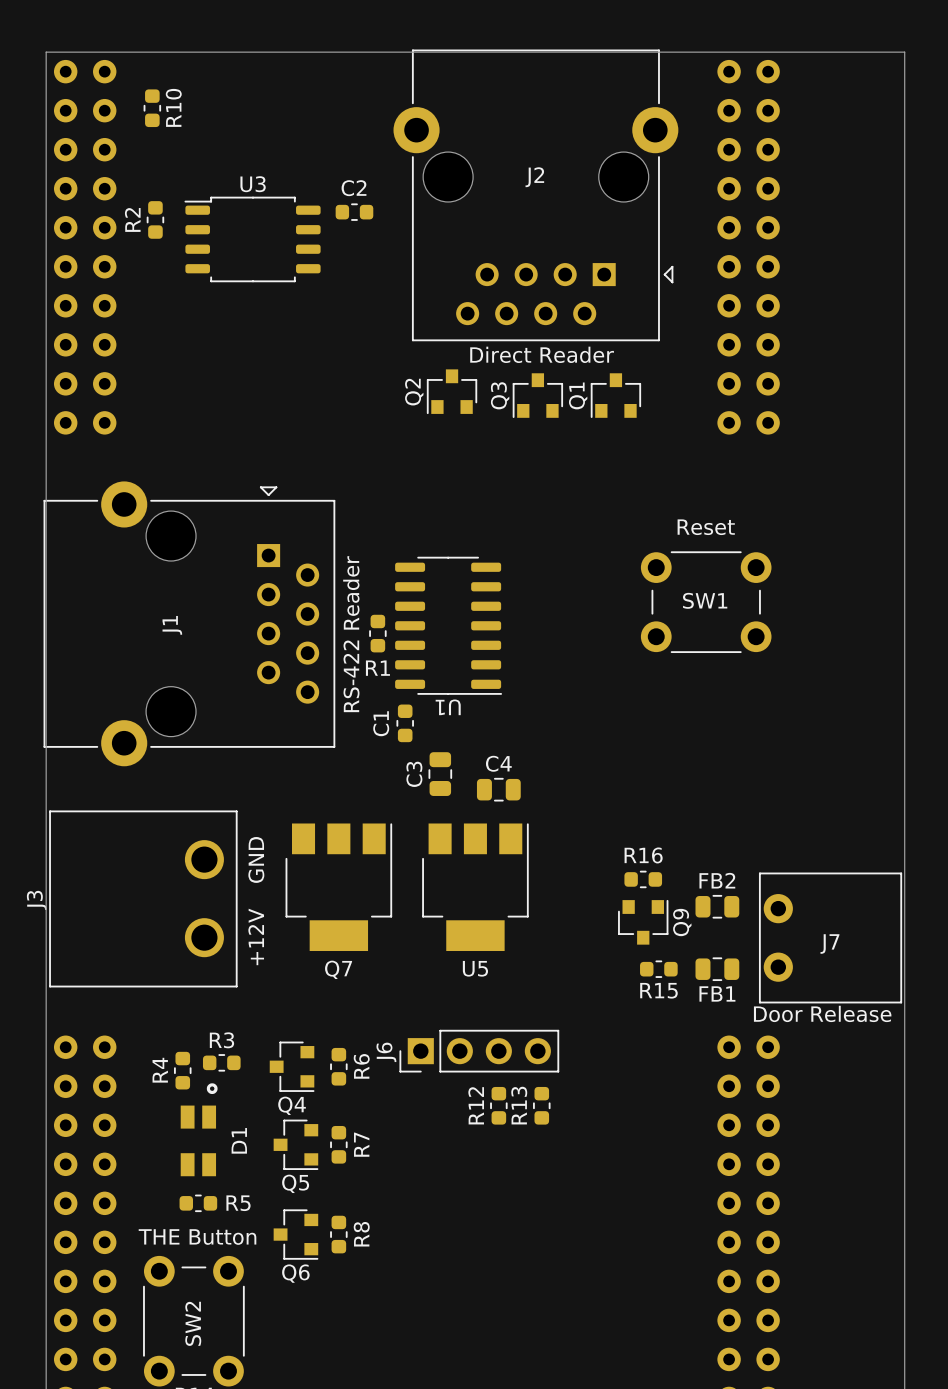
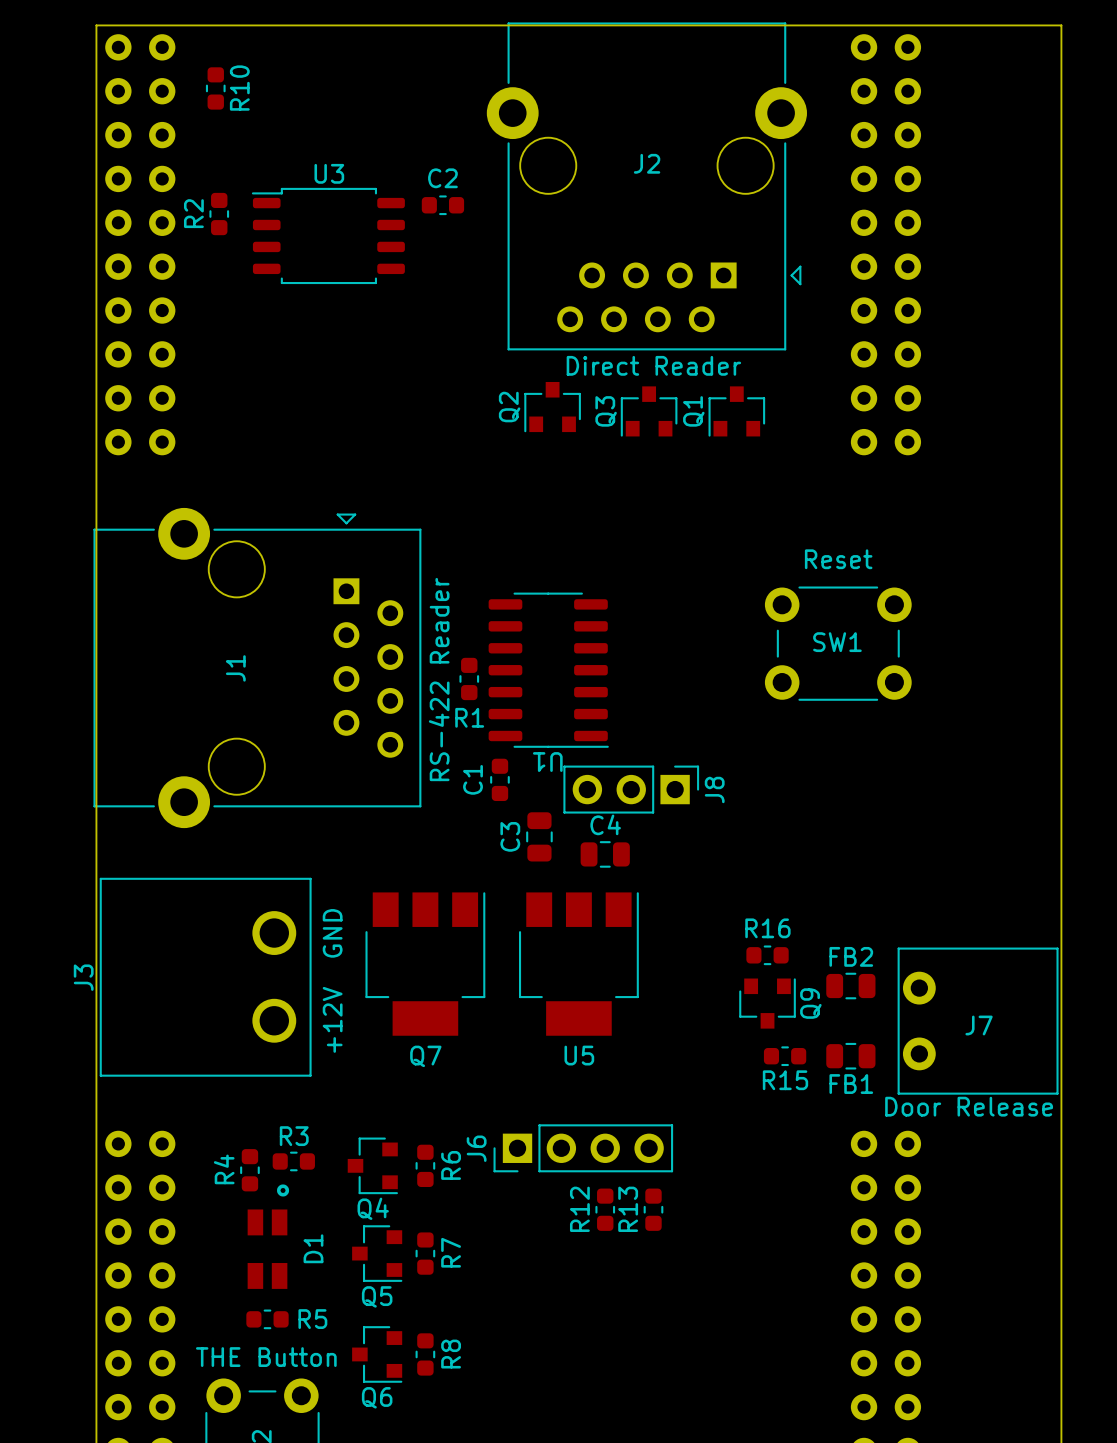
J8: none -> (631, 789)

